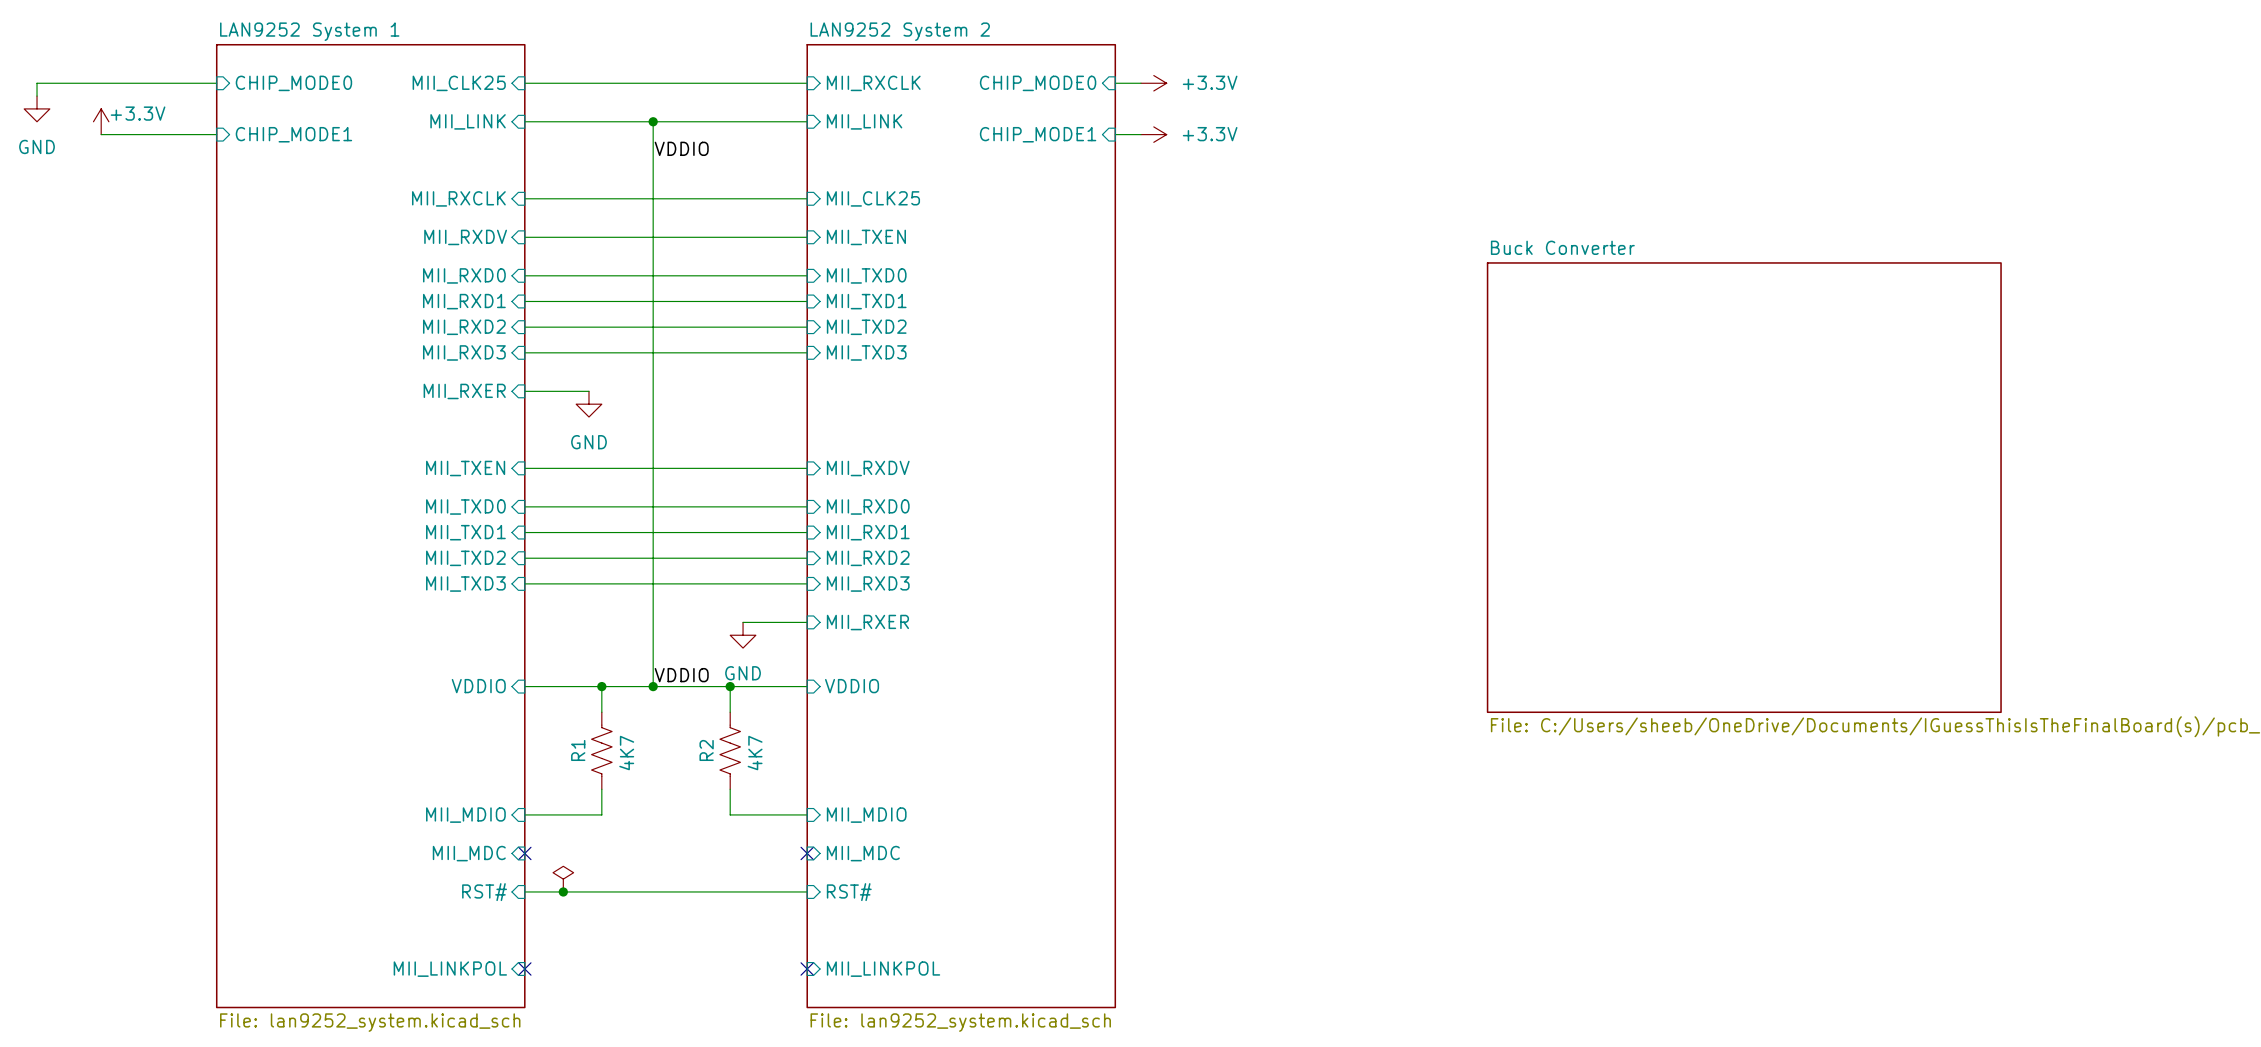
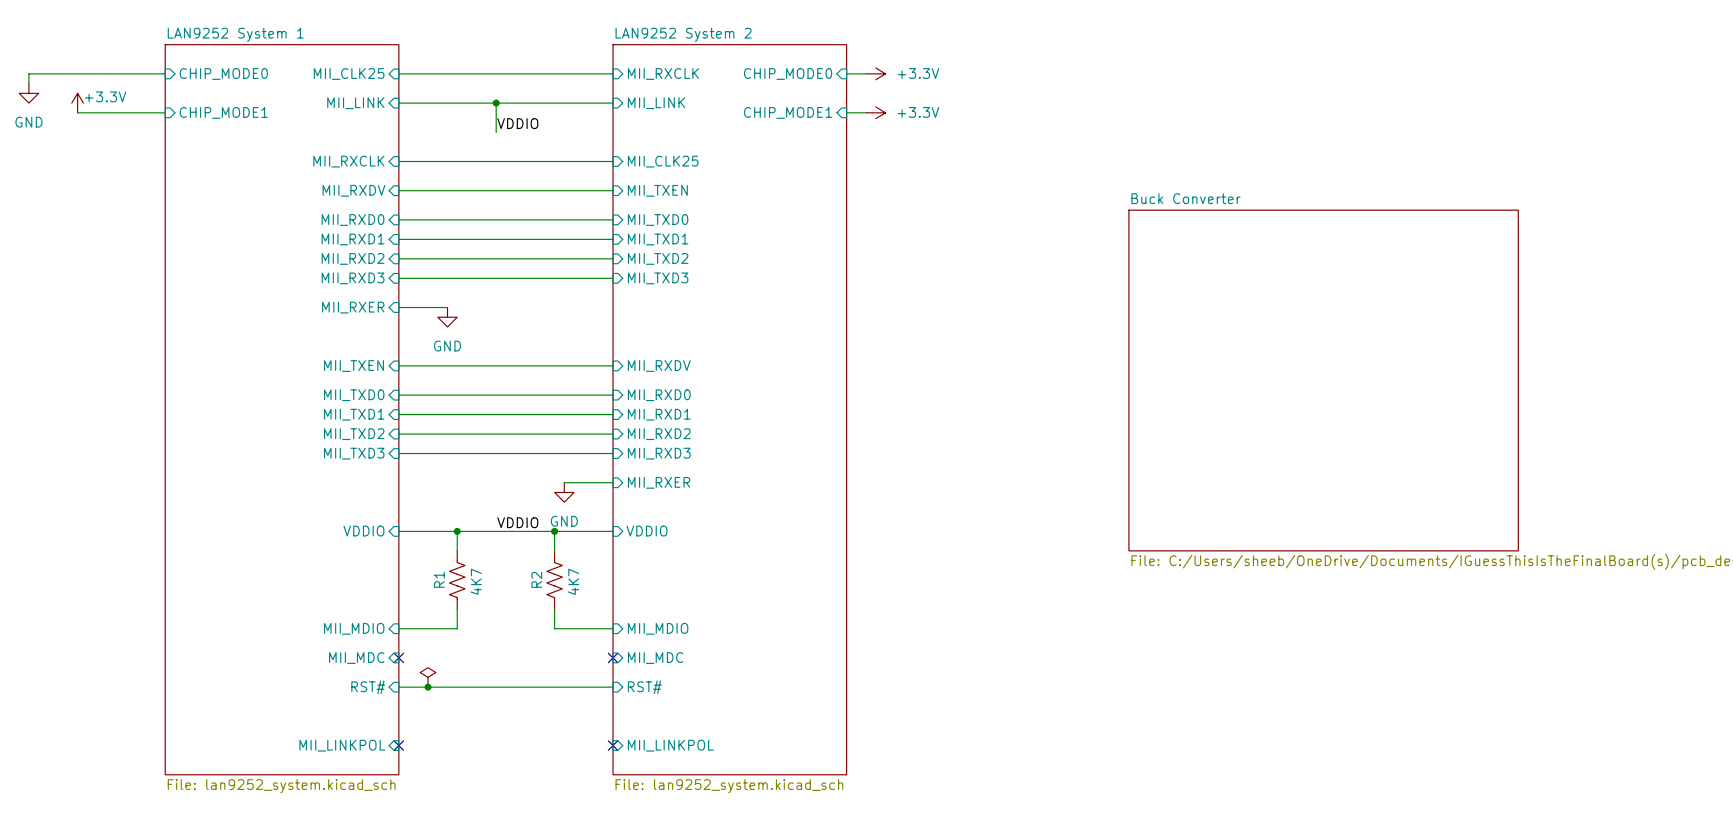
wire: (653, 160) (653, 686) -> none
junction: (653, 686) -> none

